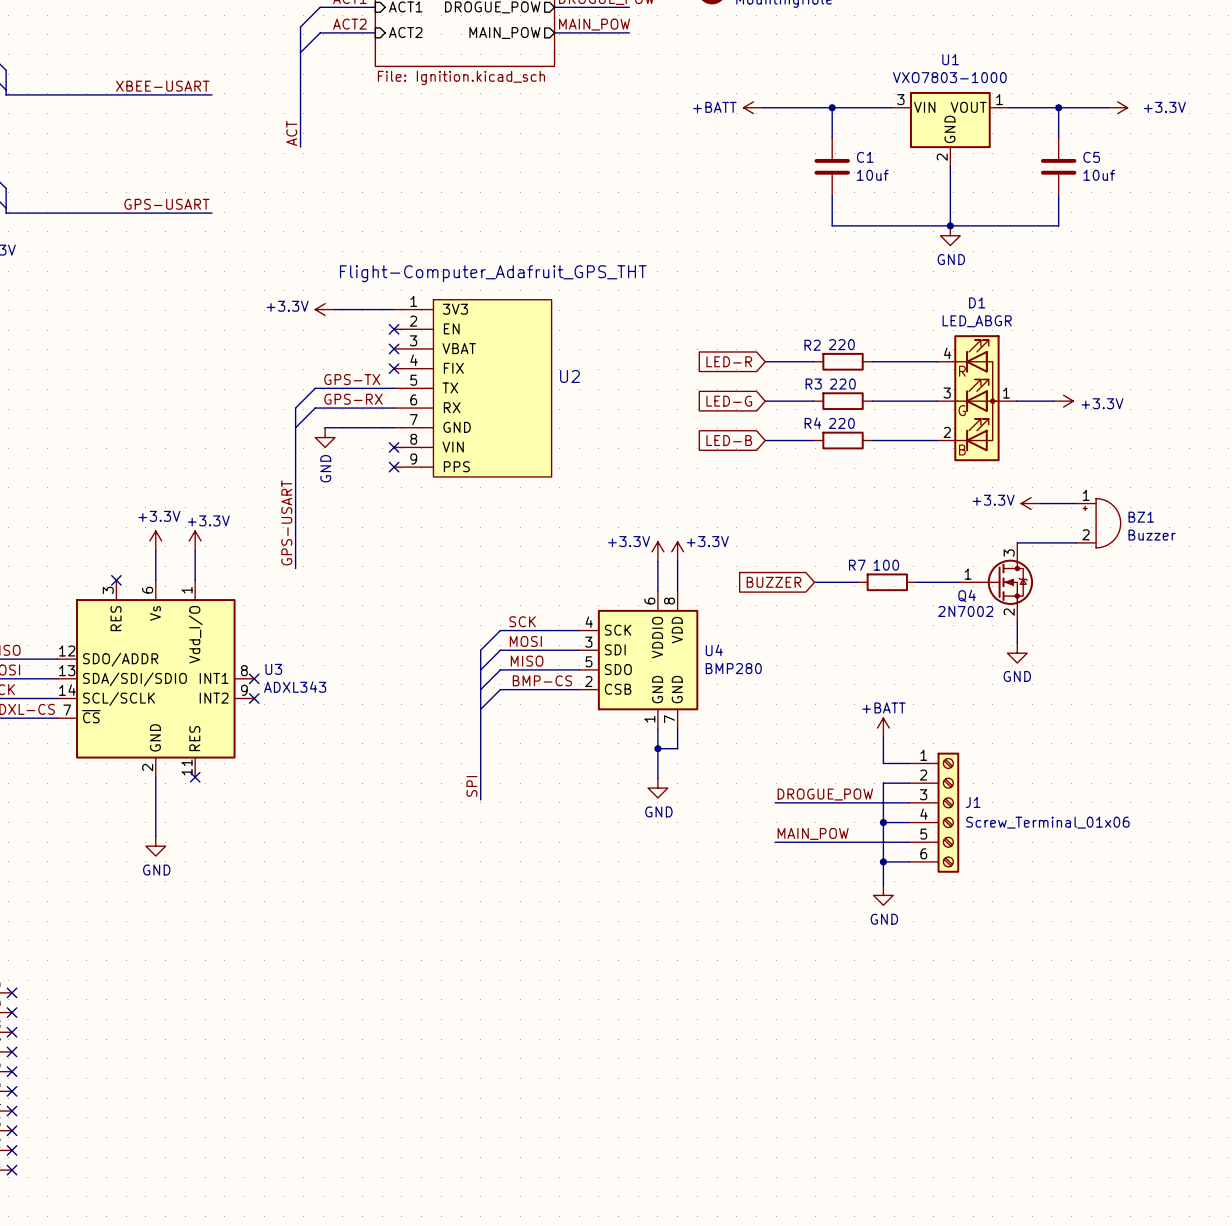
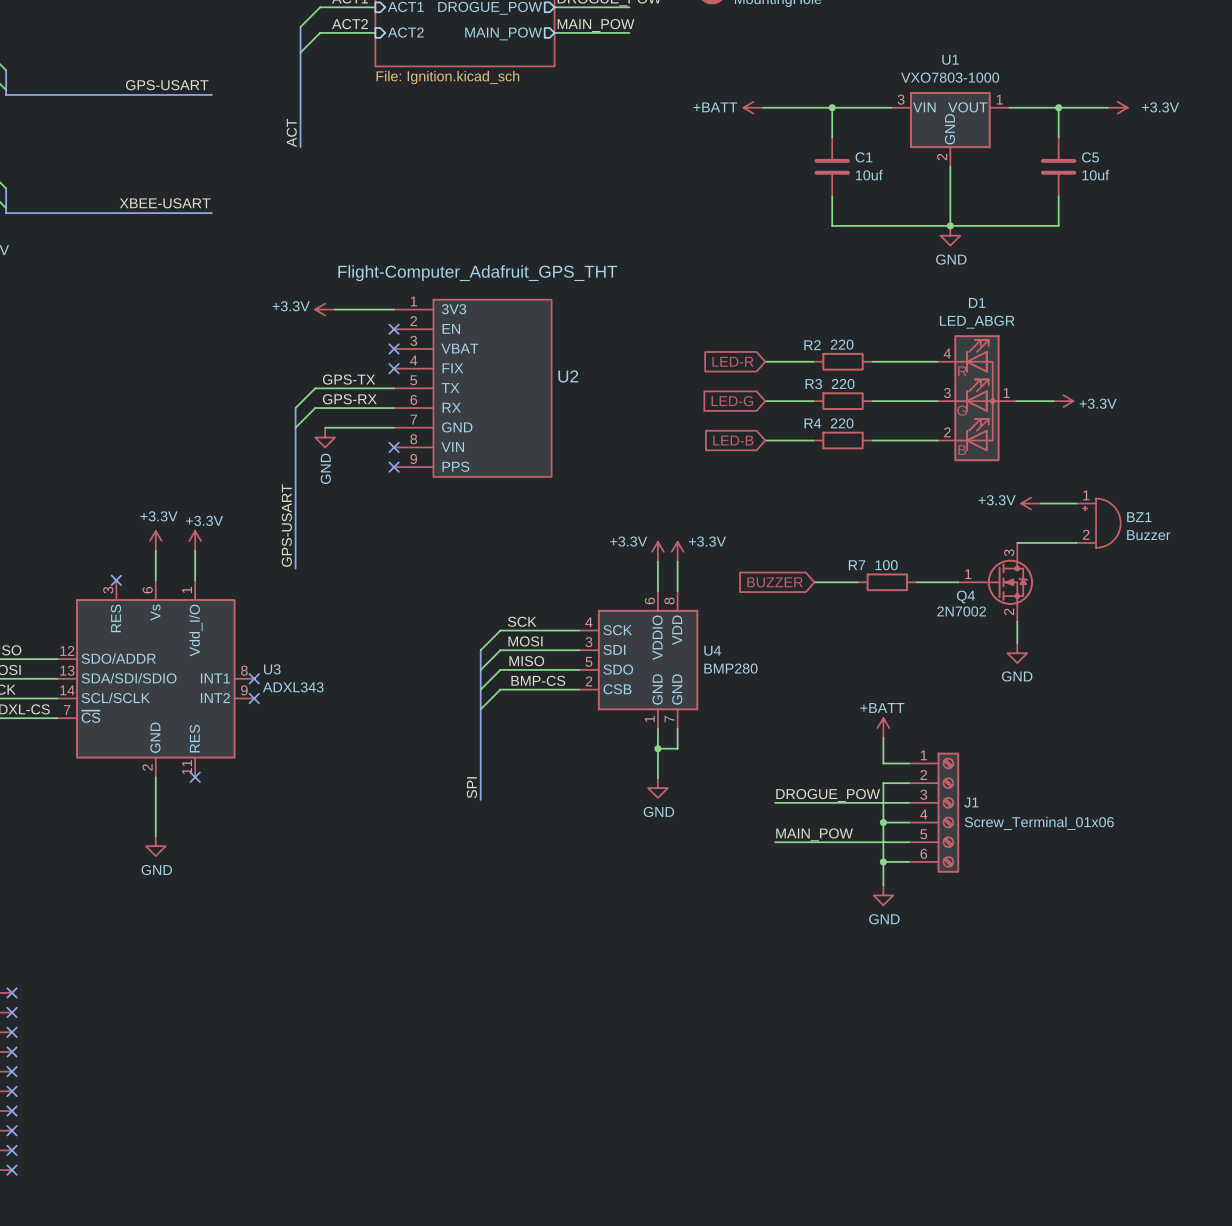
label: XBEE-USART (162, 86) -> GPS-USART (167, 85)
label: GPS-USART (166, 204) -> XBEE-USART (165, 203)

